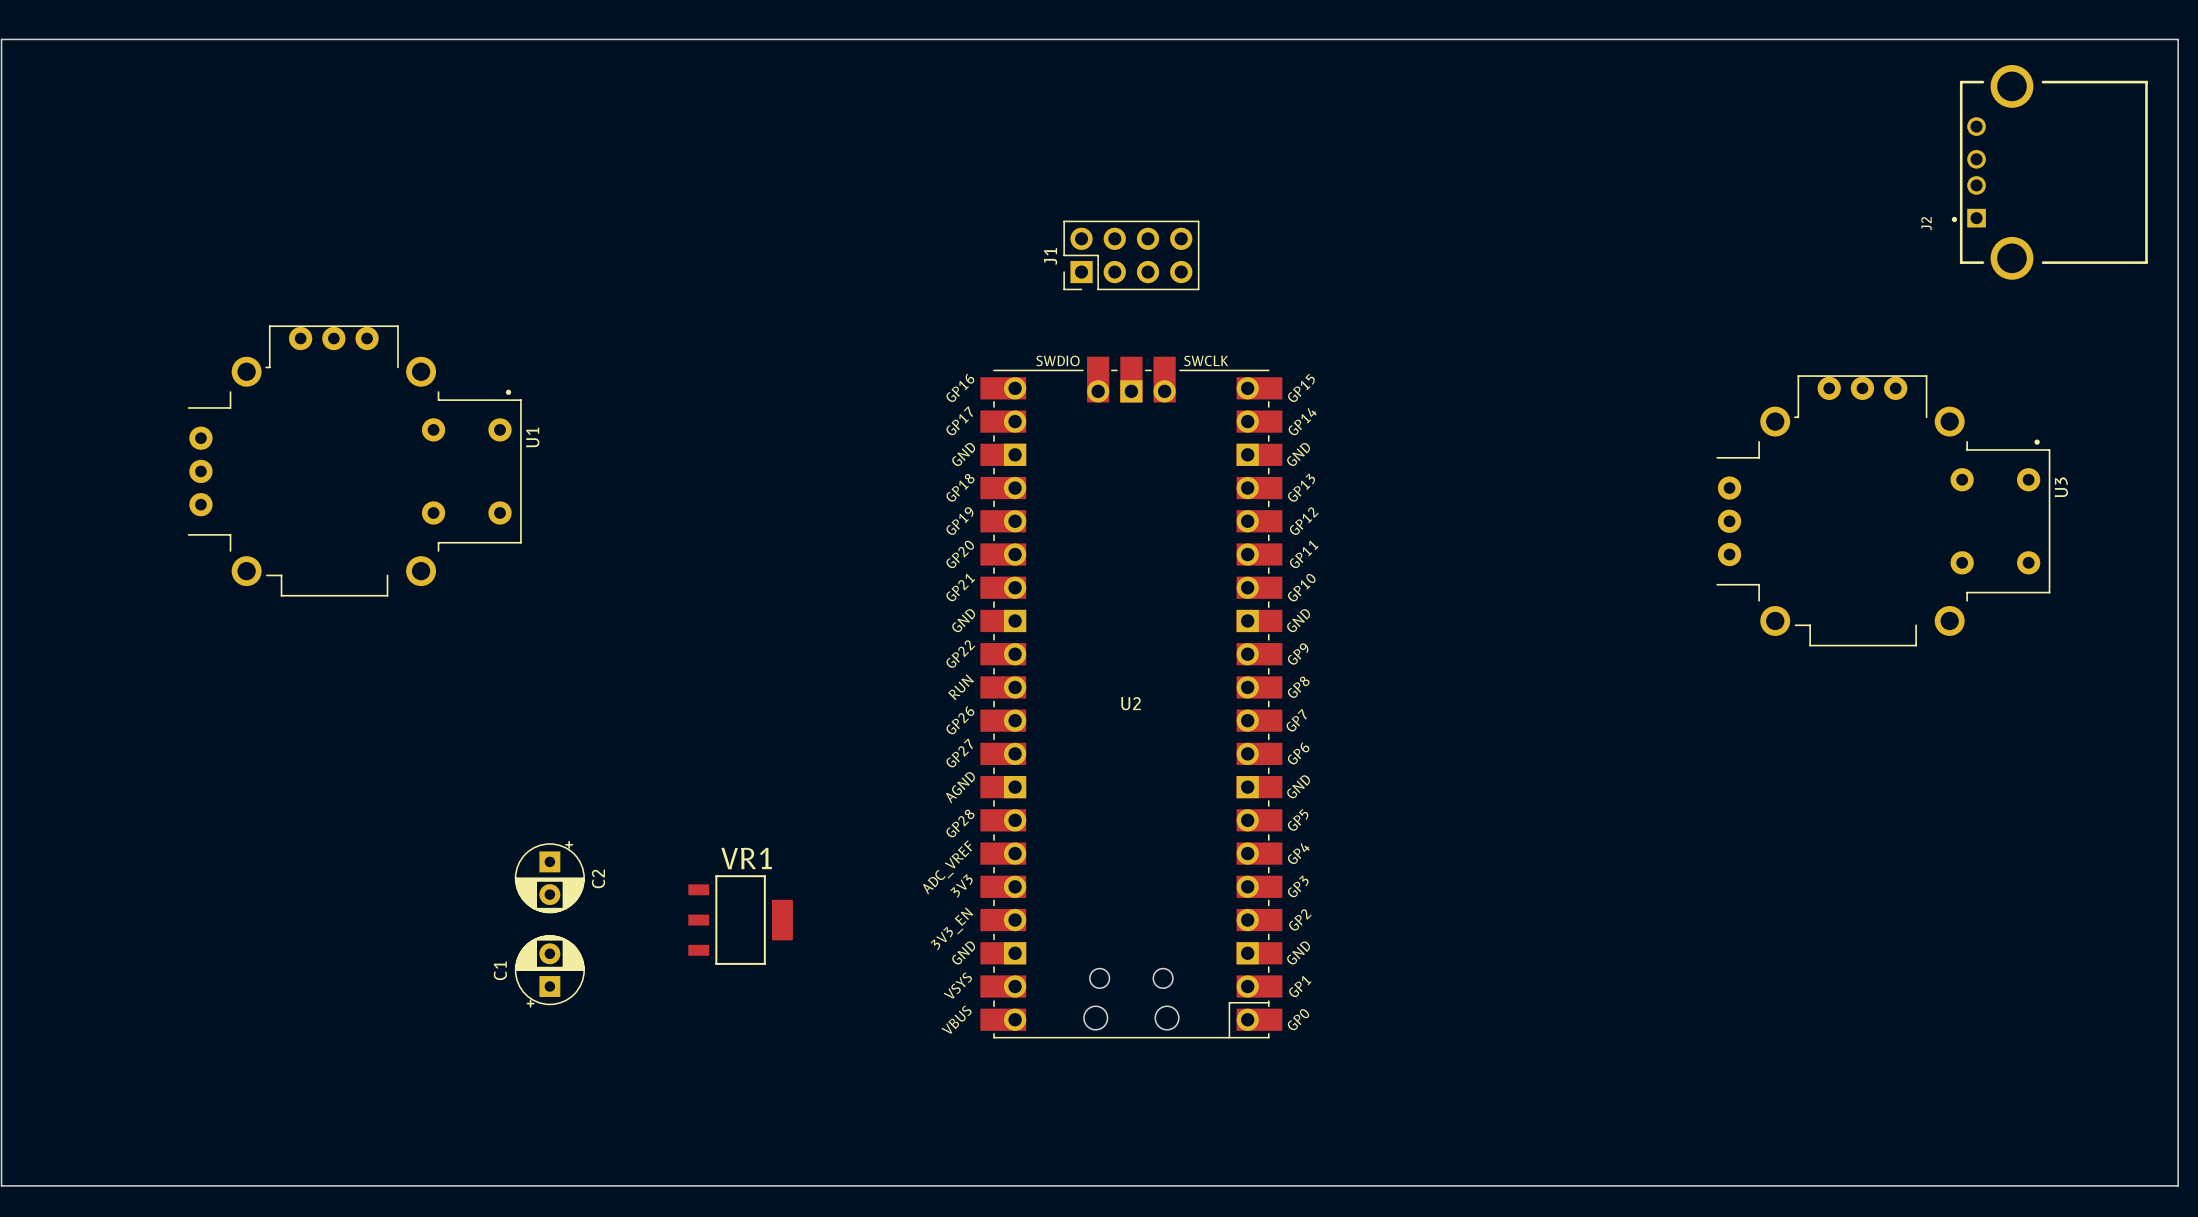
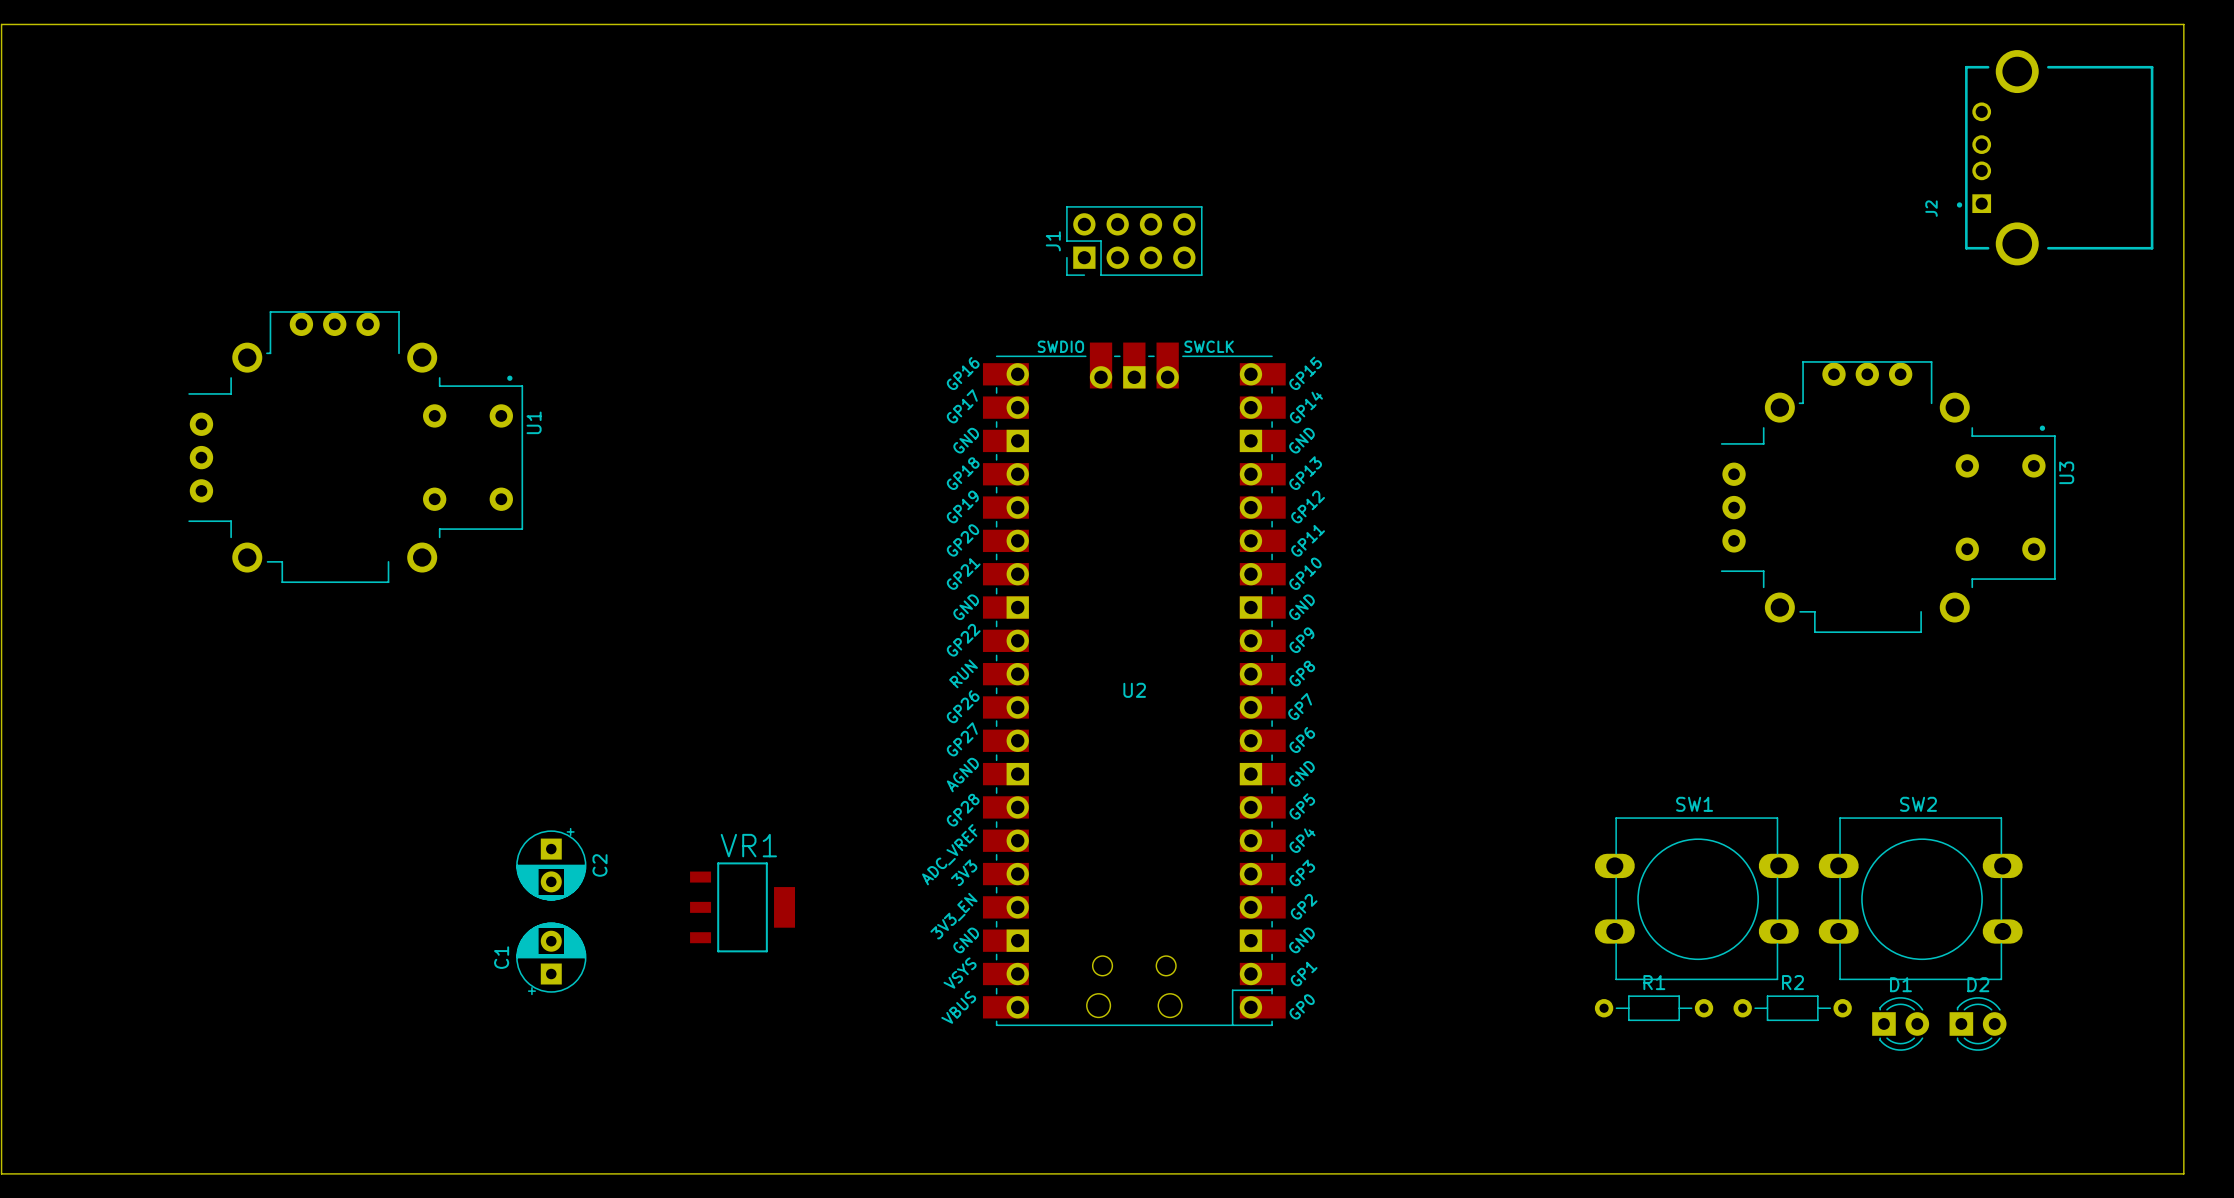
SW1: none -> (1696, 898)
SW2: none -> (1920, 898)
R1: none -> (1654, 1008)
R2: none -> (1792, 1008)
D1: none -> (1900, 1023)
D2: none -> (1978, 1023)

